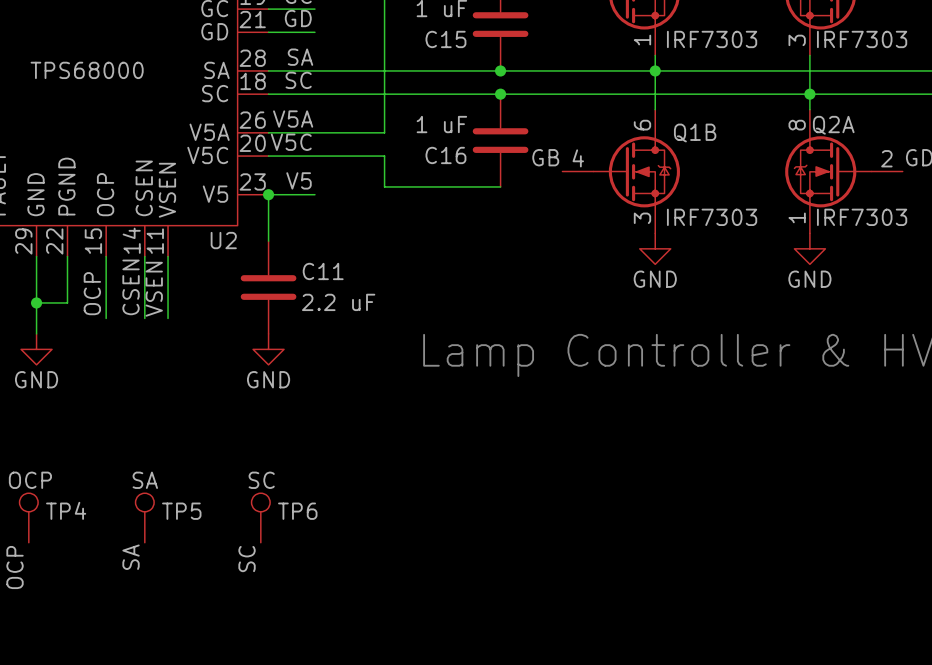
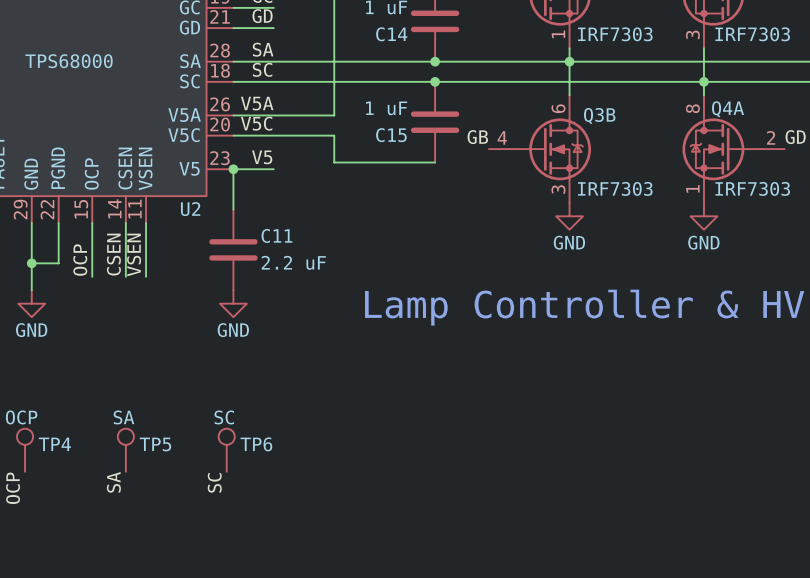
C15 name: C15 (445, 39) -> C14 (391, 34)
Q2A name: Q2A (833, 125) -> Q4A (728, 109)
Q1B name: Q1B (695, 133) -> Q3B (599, 116)
C16 name: C16 (445, 155) -> C15 (391, 135)

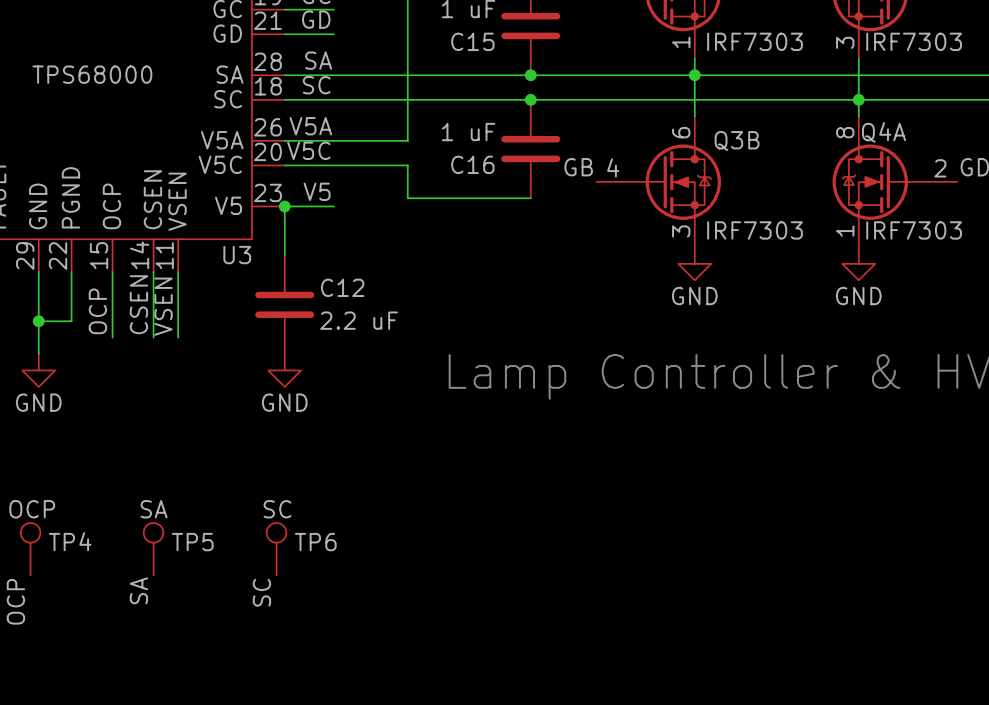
C14 name: C14 (391, 34) -> C15 (472, 41)
C15 name: C15 (391, 135) -> C16 (472, 164)
U2 name: U2 (190, 209) -> U3 (237, 255)
C11 name: C11 (276, 235) -> C12 (342, 287)

